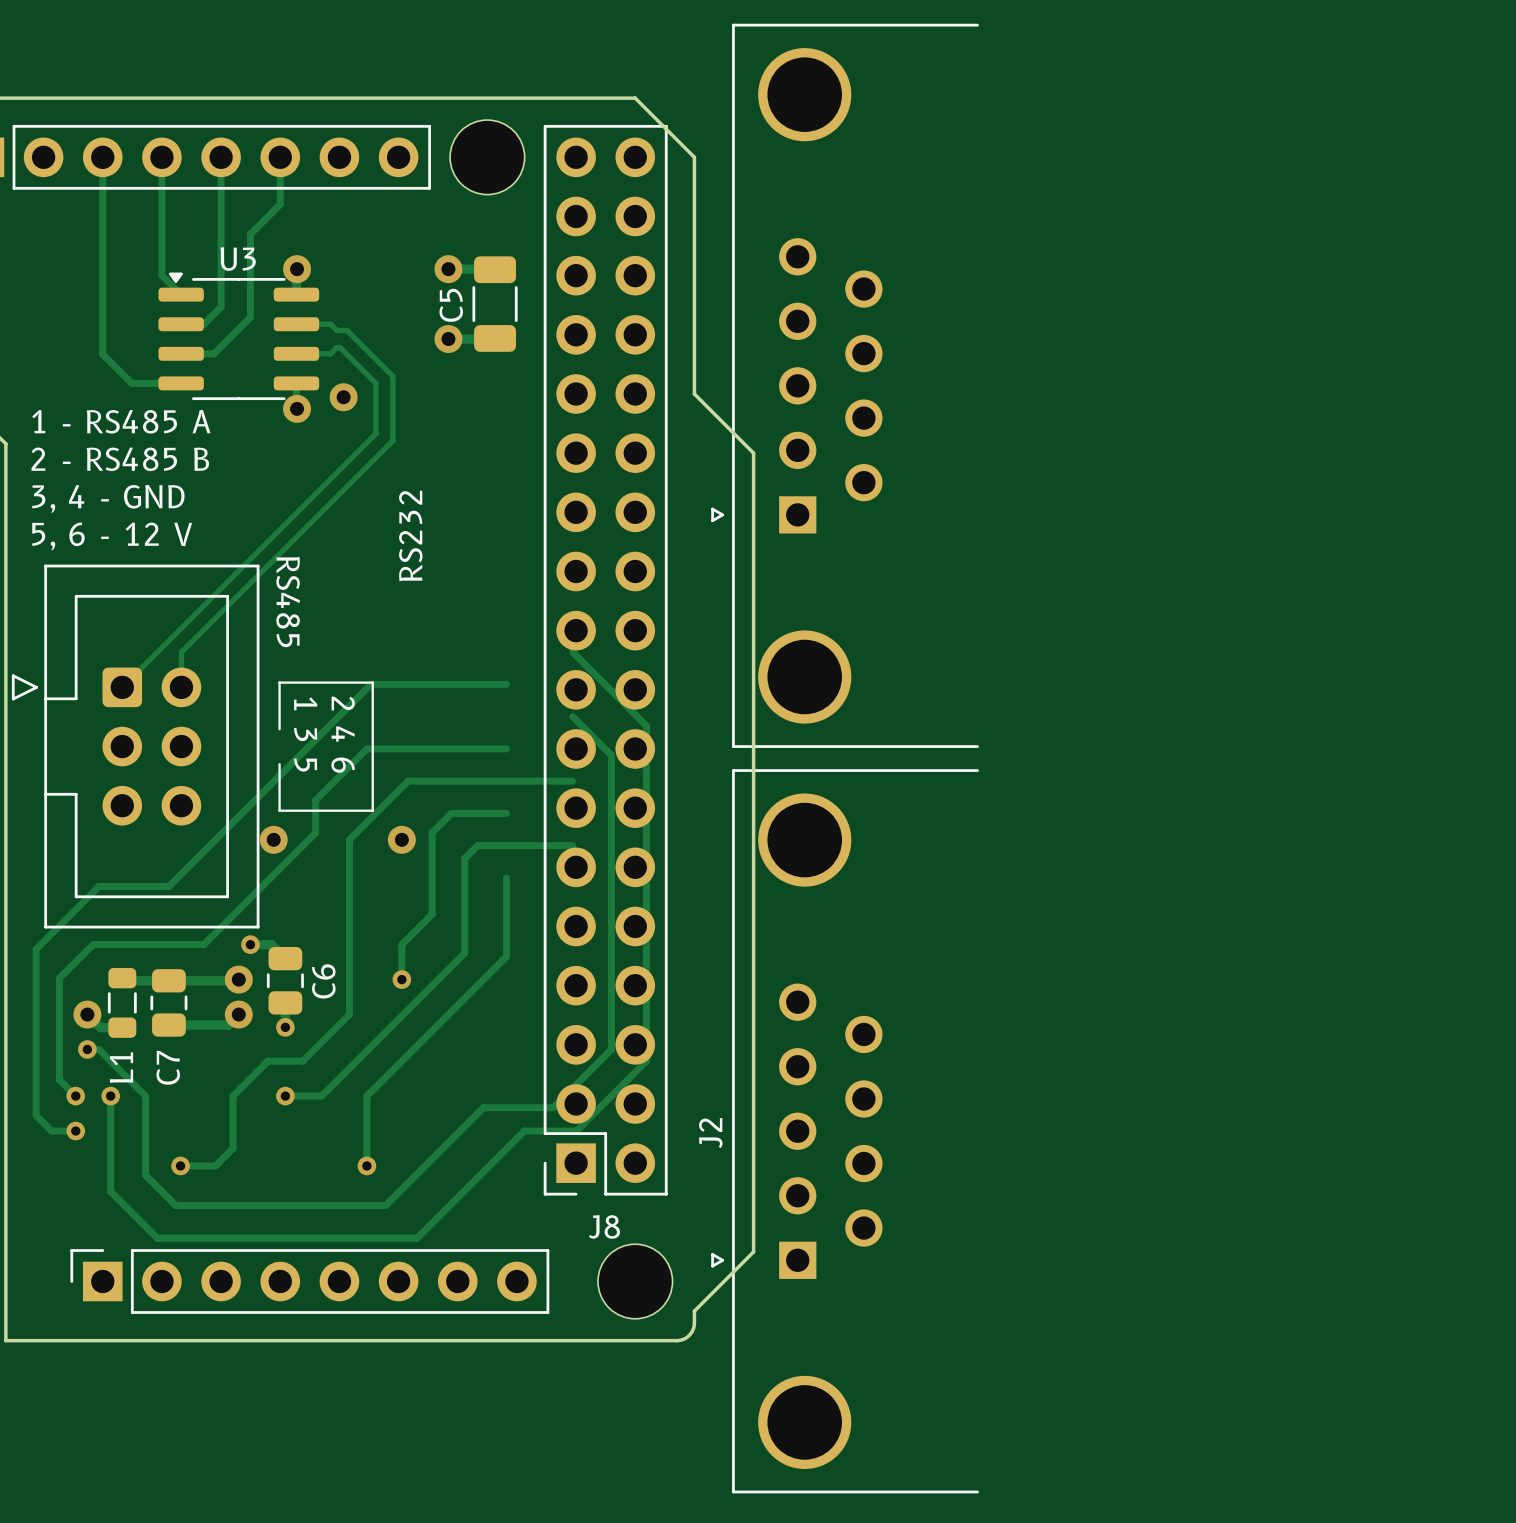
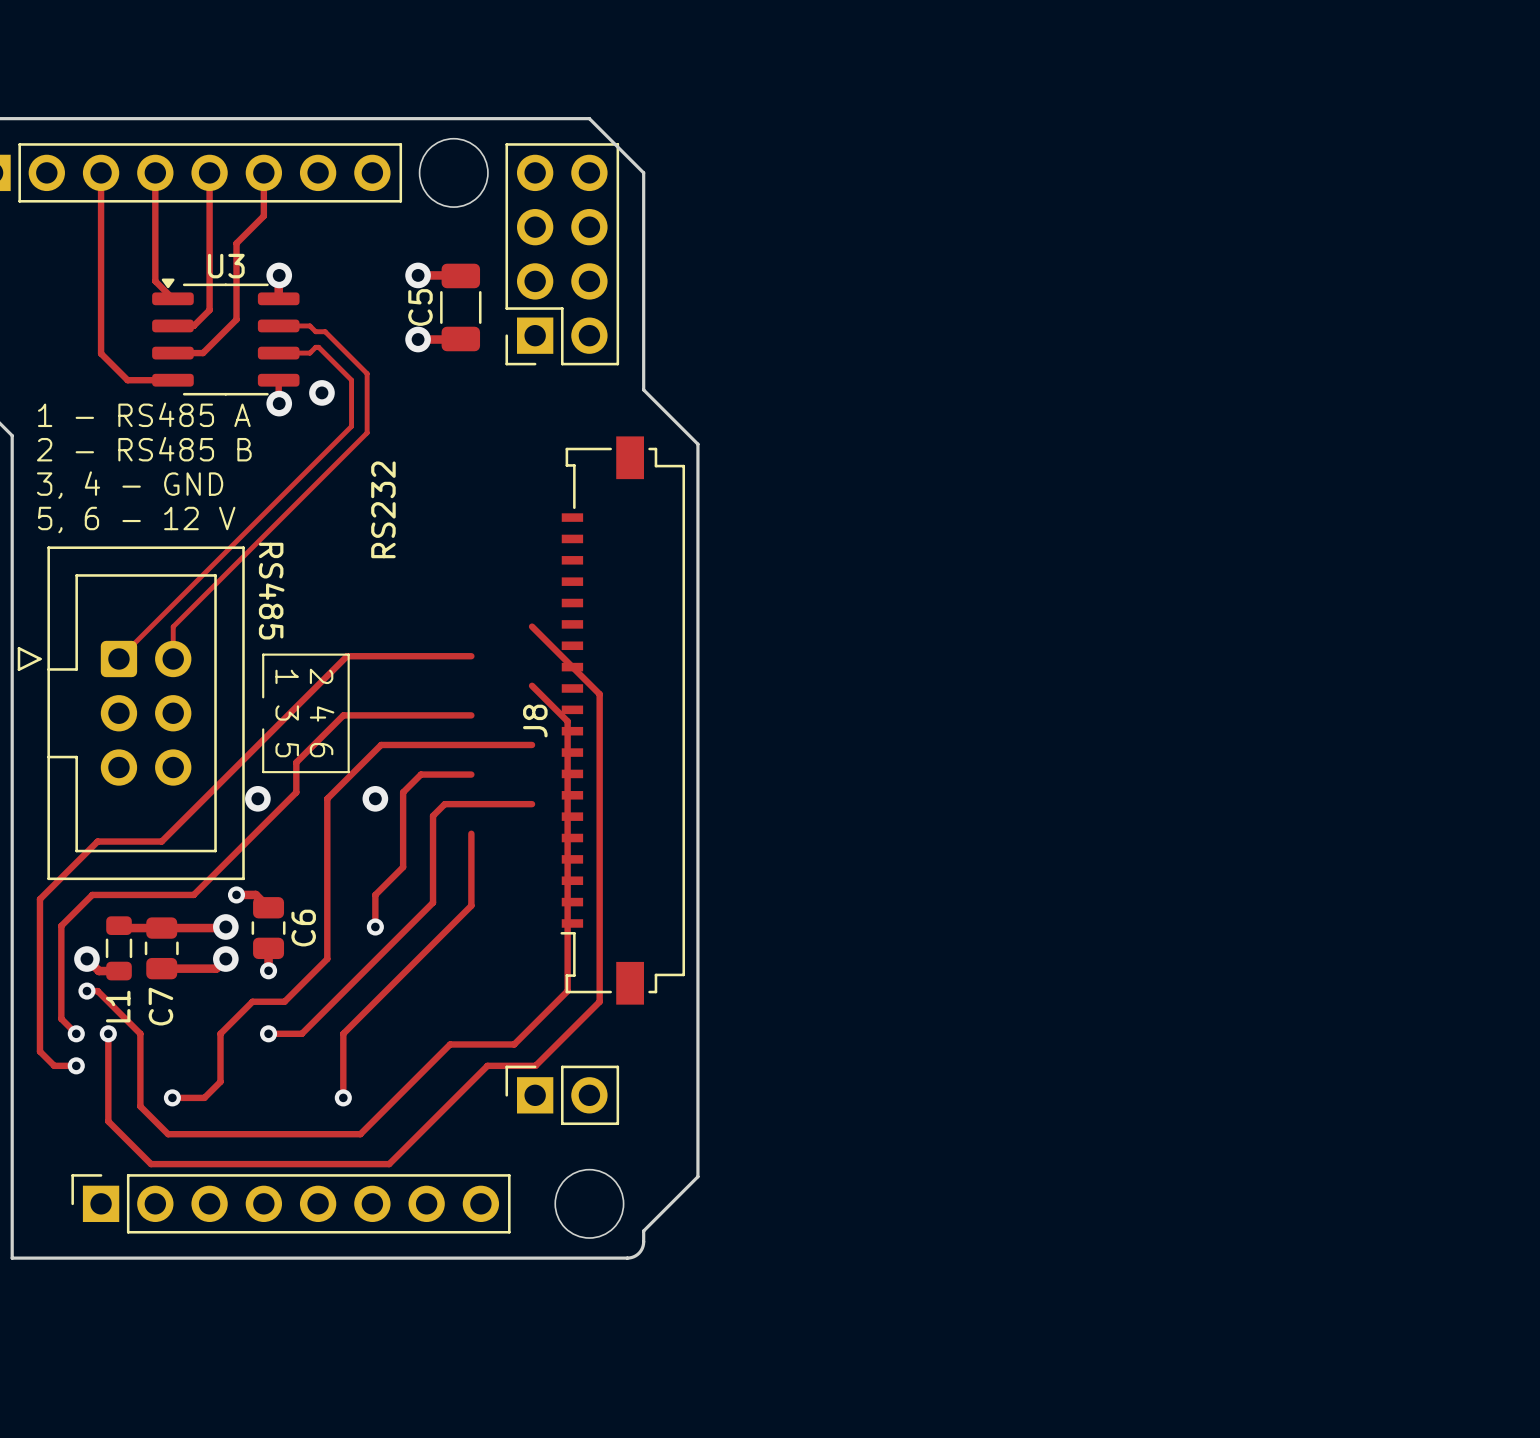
J8 footprint: [543, 124, 668, 1196] -> [560, 436, 686, 1005]
part: none -> (562, 254)
part: (845, 385) -> none
J2: (845, 1131) -> none
part: none -> (562, 1095)
J8 name position: J8 (604, 1226) -> J8 (535, 721)

